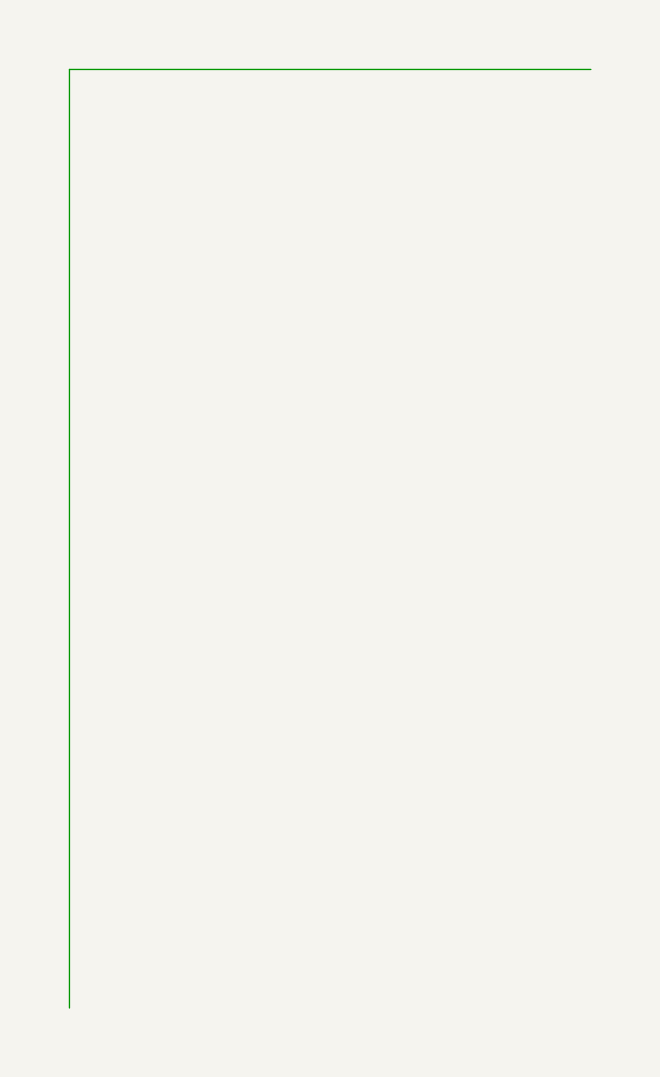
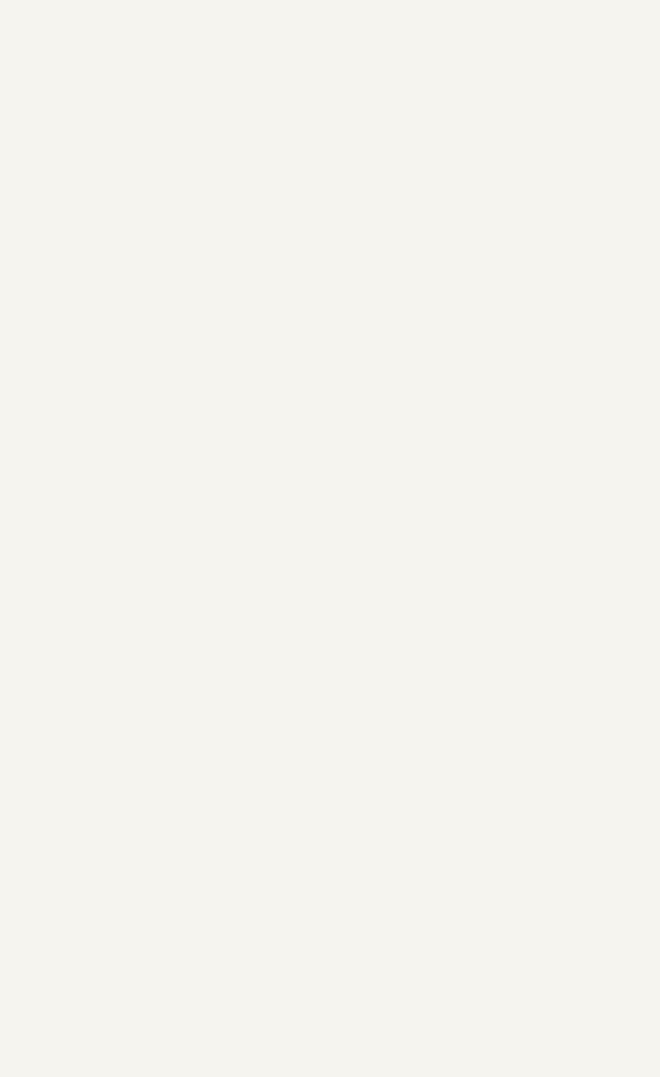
wire: (590, 69) (69, 69) (69, 1008) -> none

